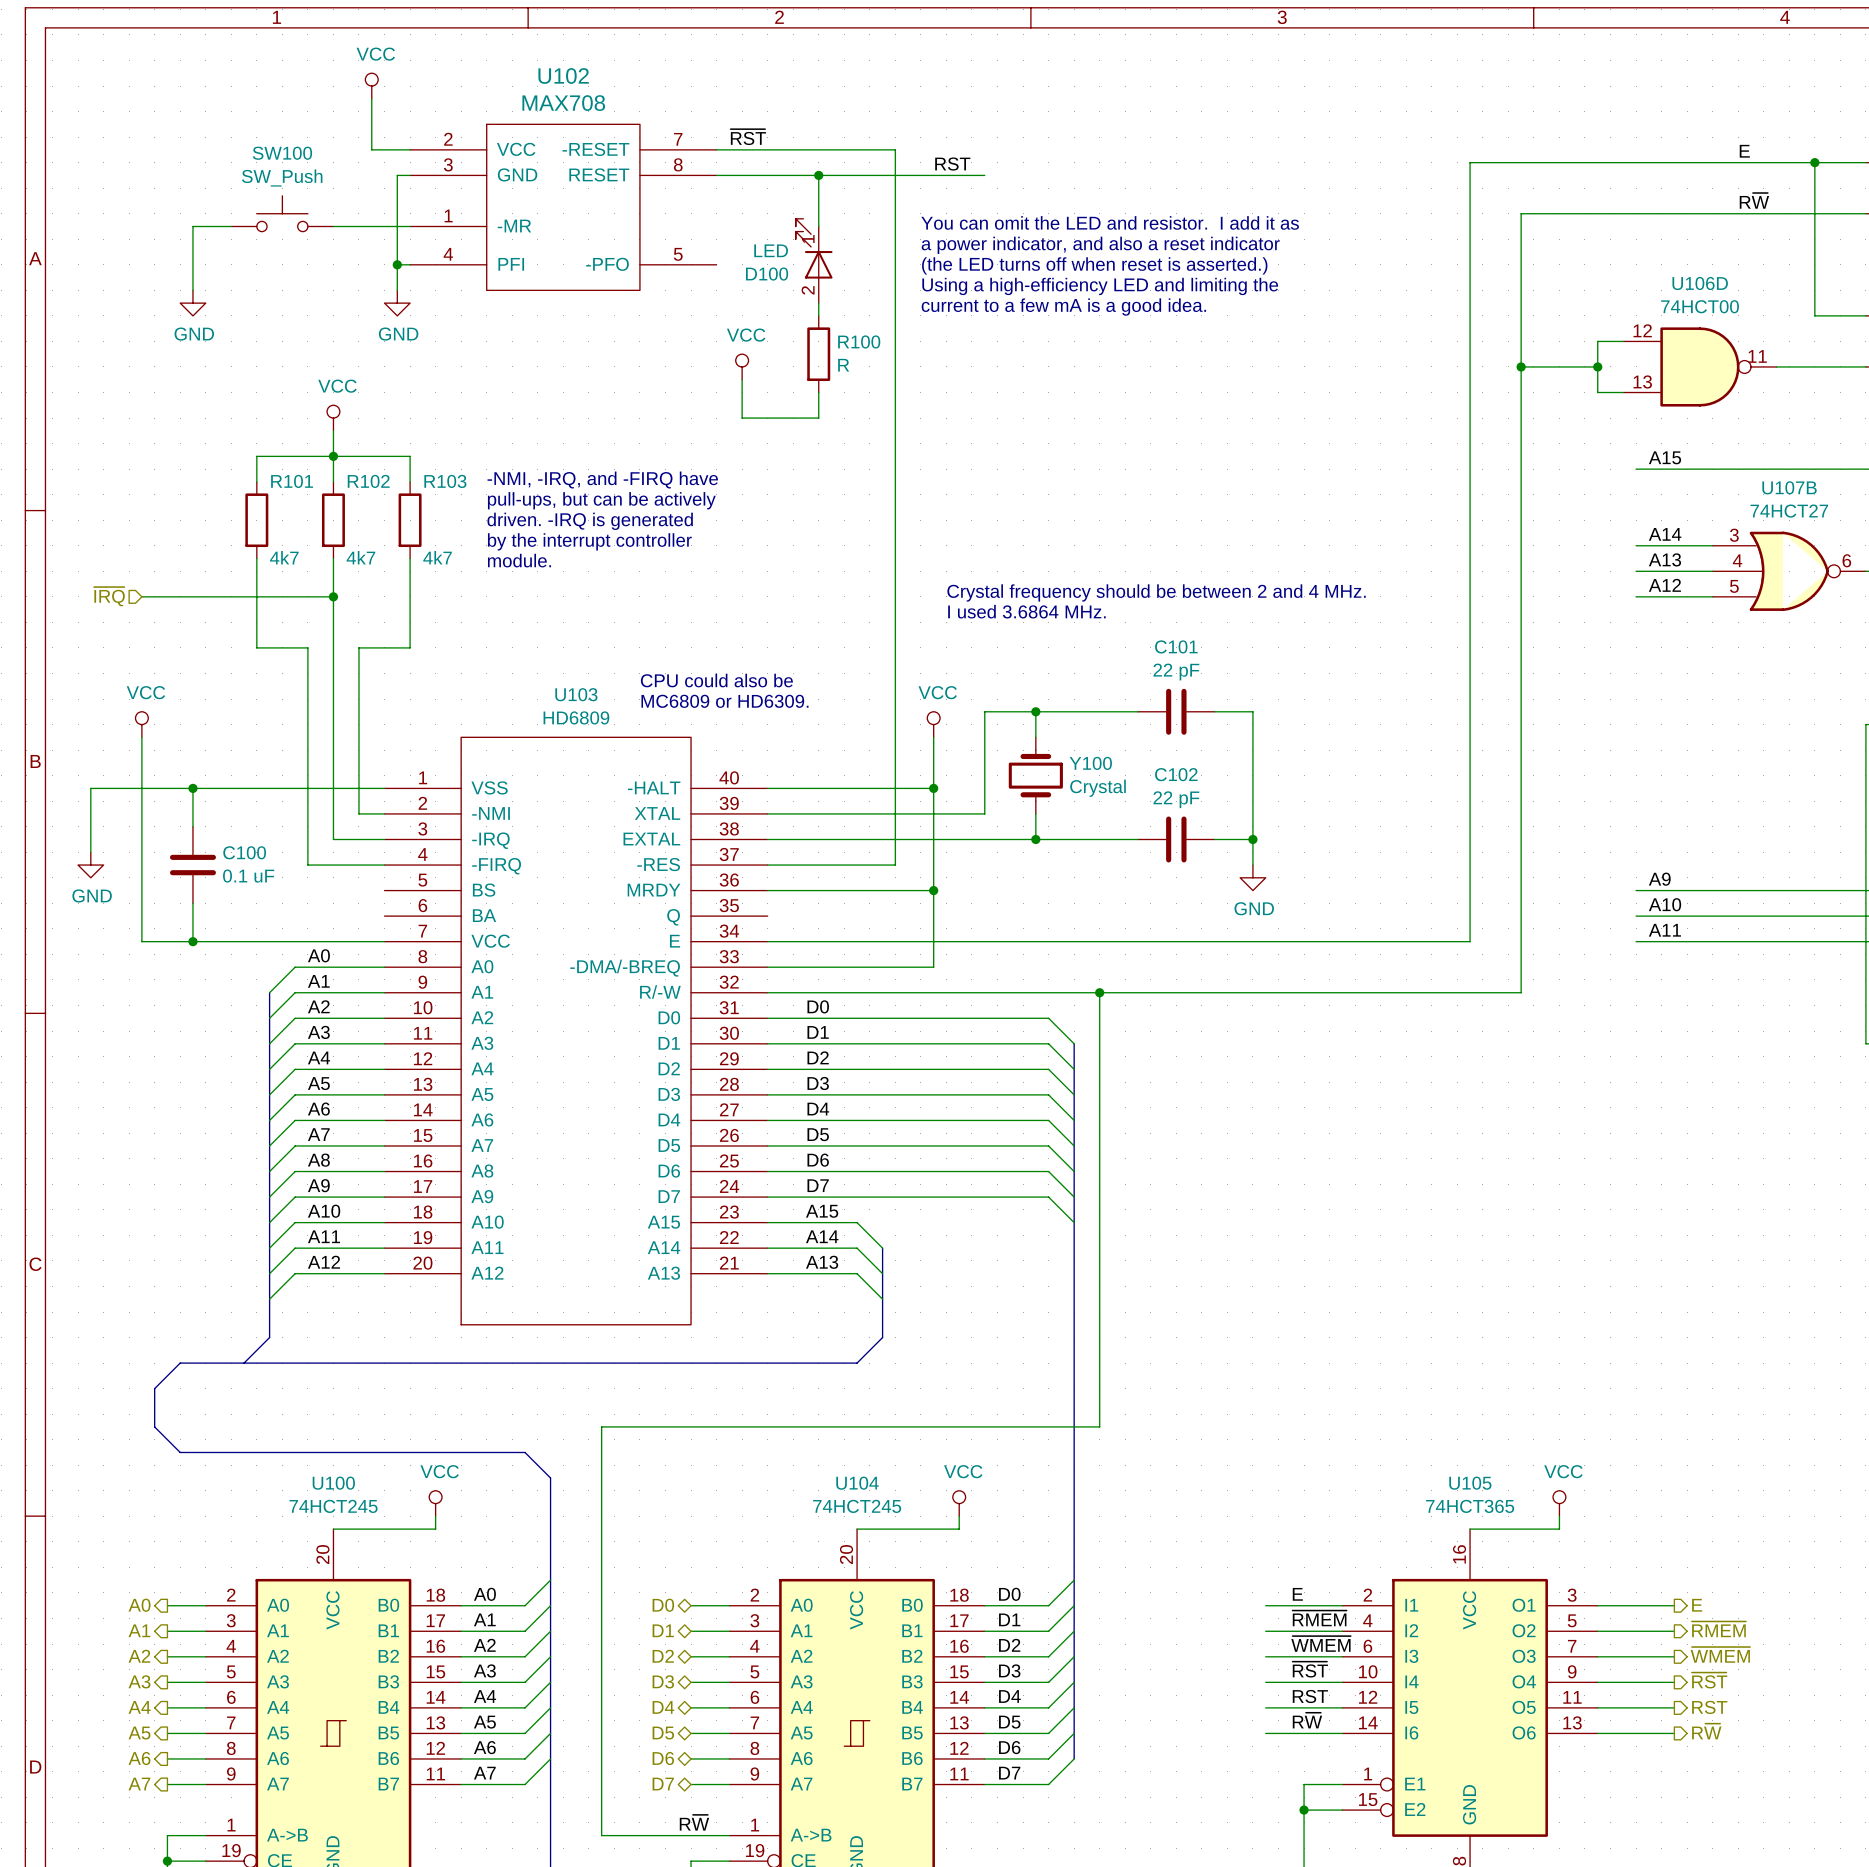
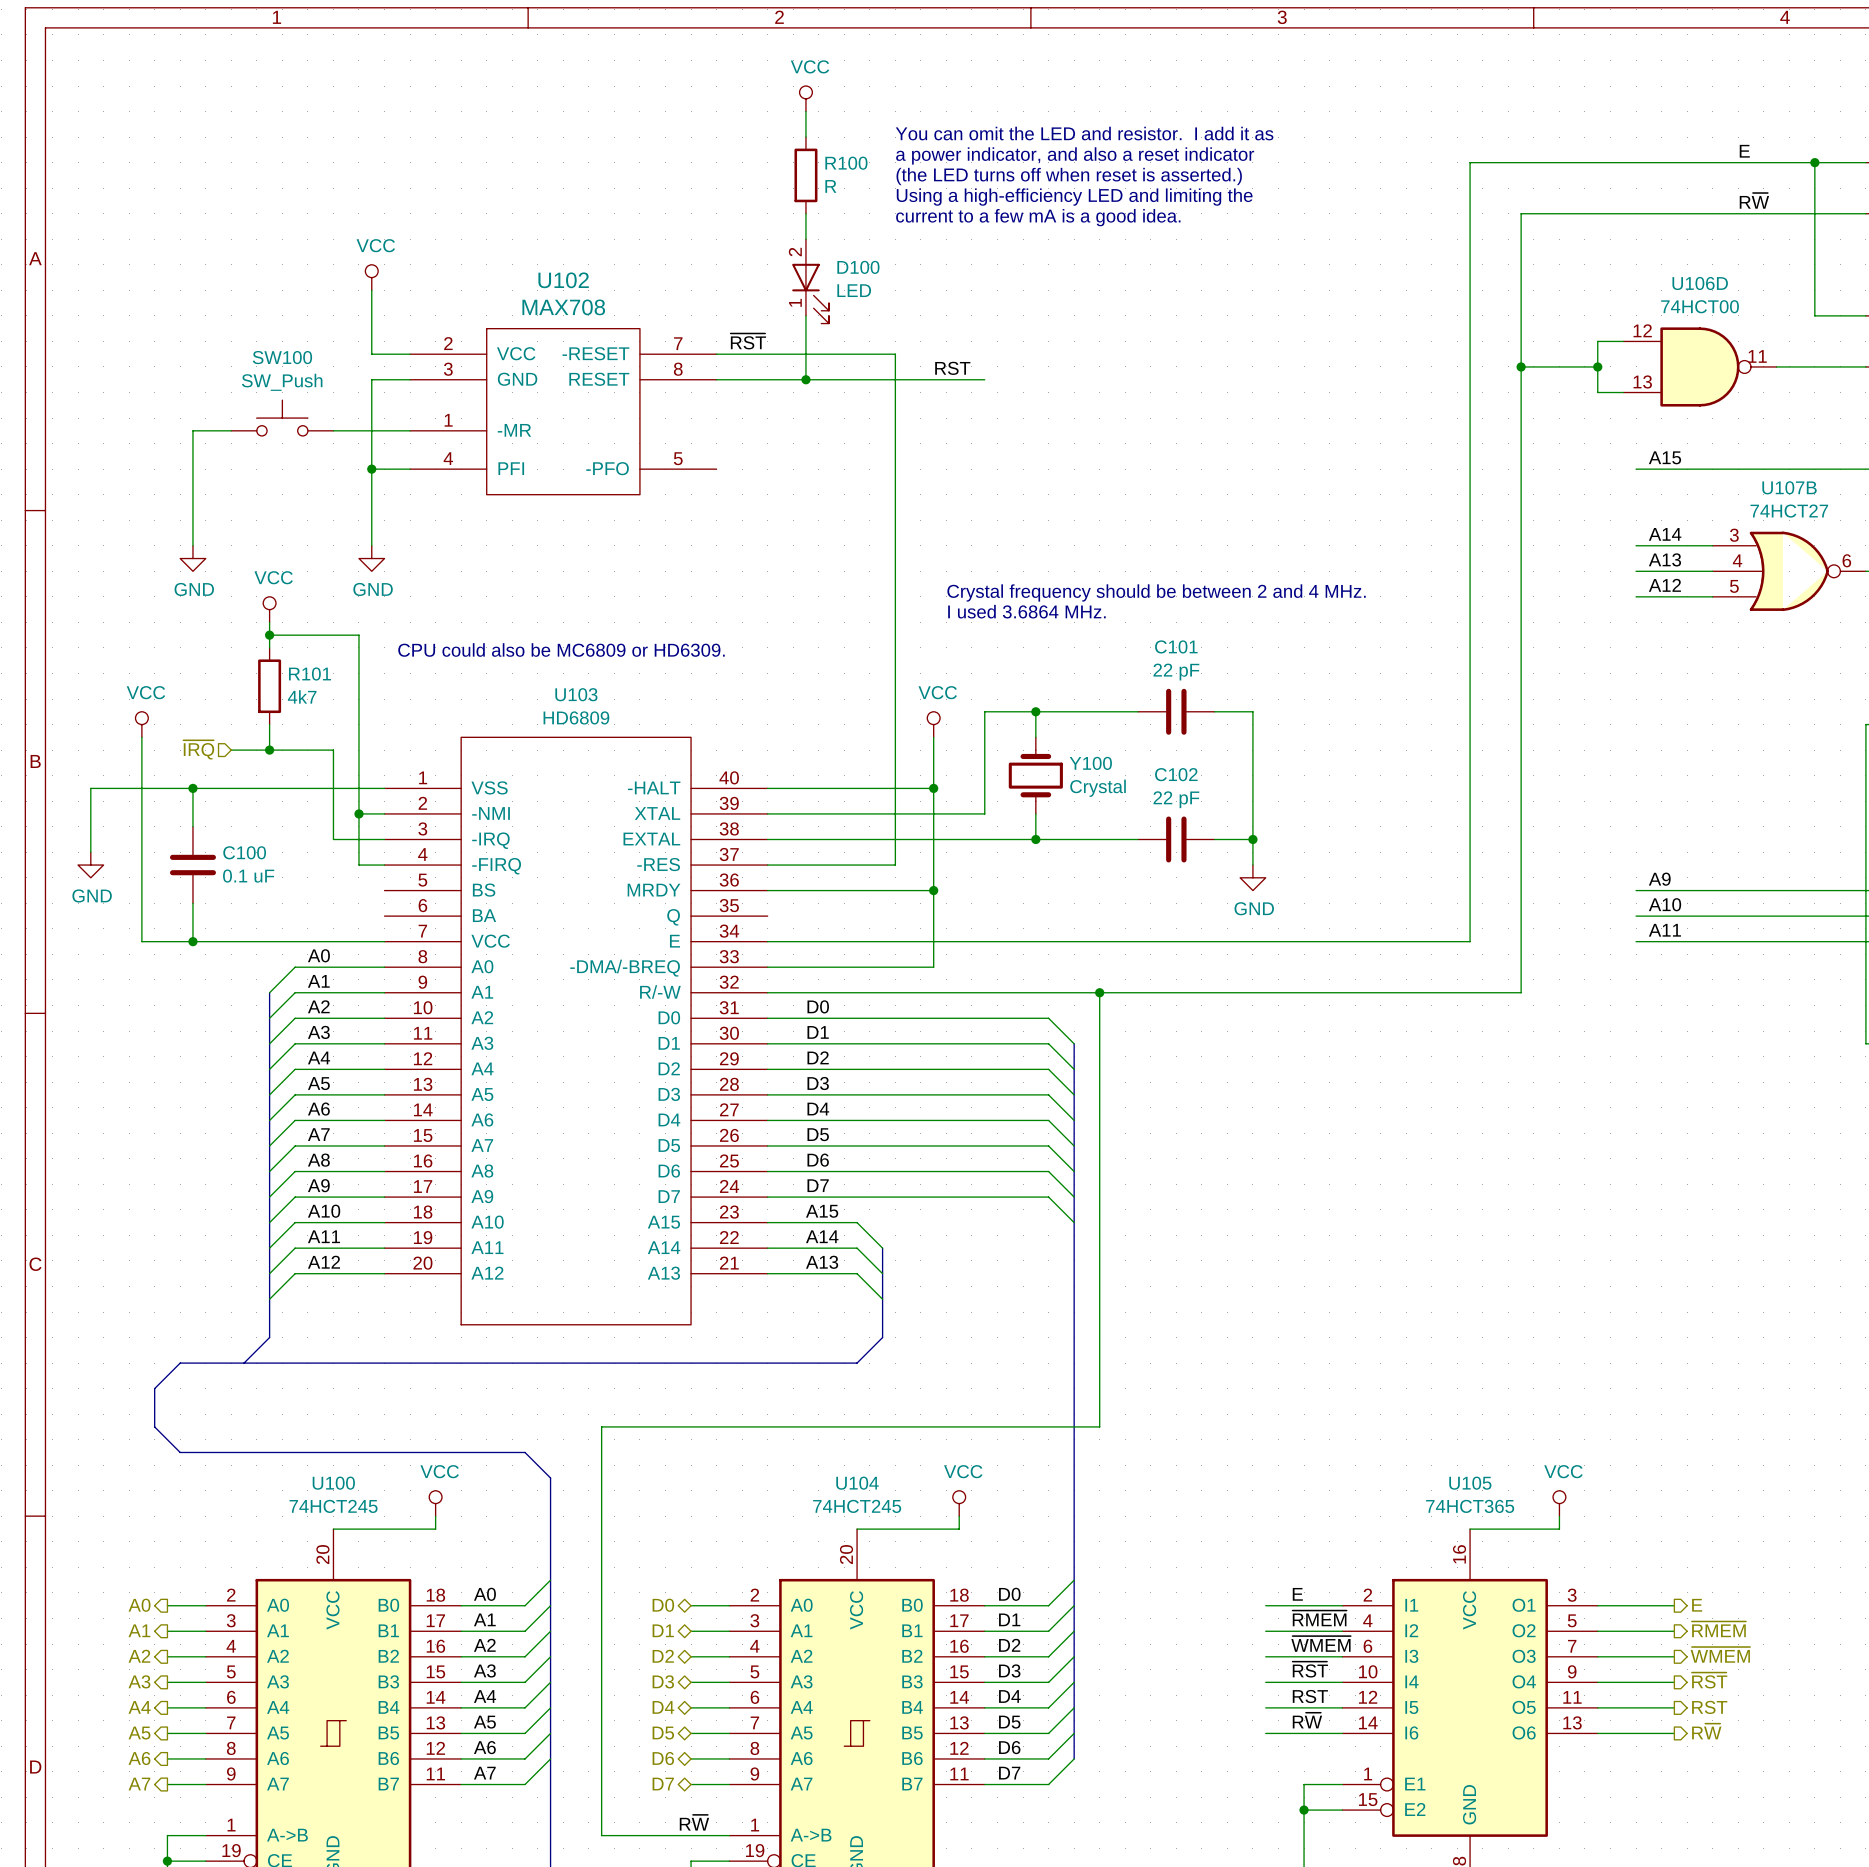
power symbol: VCC (371, 86) -> none
wire: (371, 98) (371, 149) (410, 149) -> none
power symbol: none -> VCC (805, 98)
wire: none -> (805, 111) (805, 137)
label position: ~{RST} (748, 137) -> ~{RST} (748, 341)
wire: (716, 149) (895, 149) (895, 354) -> (716, 354) (895, 354)
label position: RST (952, 164) -> RST (952, 368)
wire: (410, 175) (397, 175) (397, 290) -> none
wire: (716, 175) (984, 175) -> (716, 379) (984, 379)
wire: (818, 175) (818, 226) -> none
junction: (818, 175) -> none
U102 position: (563, 207) -> (563, 411)
SW100 position: (282, 213) -> (282, 418)
wire: none -> (805, 213) (805, 239)
text position: You can omit the LED and resistor. I add it as (1110, 222) -> You can omit the LED and resistor. I add it as (1084, 133)
wire: (231, 226) (192, 226) (192, 290) -> none
wire: (333, 226) (410, 226) -> none
text position: a power indicator, and also a reset indicator (1100, 245) -> a power indicator, and also a reset indicator (1075, 155)
D100 rotation: 0° (814, 248) -> 180° (810, 293)
wire: (397, 264) (410, 264) -> none
junction: (397, 264) -> none
text position: (the LED turns off when reset is asserted.) (1094, 265) -> (the LED turns off when reset is asserted.) (1069, 176)
power symbol: none -> VCC (371, 277)
text position: Using a high-efficiency LED and limiting the (1100, 286) -> Using a high-efficiency LED and limiting the (1074, 197)
wire: none -> (371, 290) (371, 354) (410, 354)
power symbol: GND (192, 303) -> none
power symbol: GND (397, 303) -> none
wire: (818, 303) (818, 315) -> none
text position: current to a few mA is a good idea. (1063, 307) -> current to a few mA is a good idea. (1038, 217)
wire: none -> (805, 315) (805, 379)
R100 position: (818, 354) -> (805, 175)
power symbol: VCC (742, 366) -> none
wire: none -> (410, 379) (371, 379) (371, 545)
wire: (742, 379) (742, 418) (818, 418) (818, 392) -> none
junction: none -> (805, 379)
power symbol: VCC (333, 418) -> none
wire: none -> (231, 430) (192, 430) (192, 545)
wire: (333, 430) (333, 481) -> (333, 430) (410, 430)
junction position: (333, 456) -> (371, 469)
wire: none -> (371, 469) (410, 469)
text: -NMI, -IRQ, and -FIRQ have (602, 480) -> none
wire: (256, 481) (256, 456) (410, 456) (410, 481) -> none
R101 name position: R101 (292, 481) -> R101 (309, 674)
text: pull-ups, but can be actively (601, 500) -> none
R101 position: (256, 520) -> (269, 686)
R102: 4k7 (333, 520) -> none
R103: 4k7 (410, 520) -> none
text: driven. -IRQ is generated (590, 521) -> none
text: by the interrupt controller (589, 541) -> none
R101 value position: 4k7 (284, 557) -> 4k7 (302, 696)
power symbol: none -> GND (192, 558)
wire: (256, 558) (256, 647) (307, 647) (307, 865) (358, 865) -> (358, 813) (358, 865)
wire: (333, 558) (333, 750) -> (231, 750) (333, 750)
power symbol: none -> GND (371, 558)
wire: (410, 558) (410, 647) (358, 647) -> (269, 635) (358, 635) (358, 647)
text: module. (519, 560) -> none
hierarchical label position: ~{IRQ} (109, 596) -> ~{IRQ} (198, 749)
wire: (141, 596) (333, 596) -> none
junction: (333, 596) -> none
power symbol: none -> VCC (269, 609)
wire: none -> (269, 622) (269, 647)
junction: none -> (269, 635)
text: none -> CPU could also be MC6809 or HD6309. (561, 649)
text: CPU could also be (716, 680) -> none
text: MC6809 or HD6309. (724, 701) -> none
wire: none -> (269, 724) (269, 750)
junction: none -> (269, 750)
junction: none -> (358, 813)

